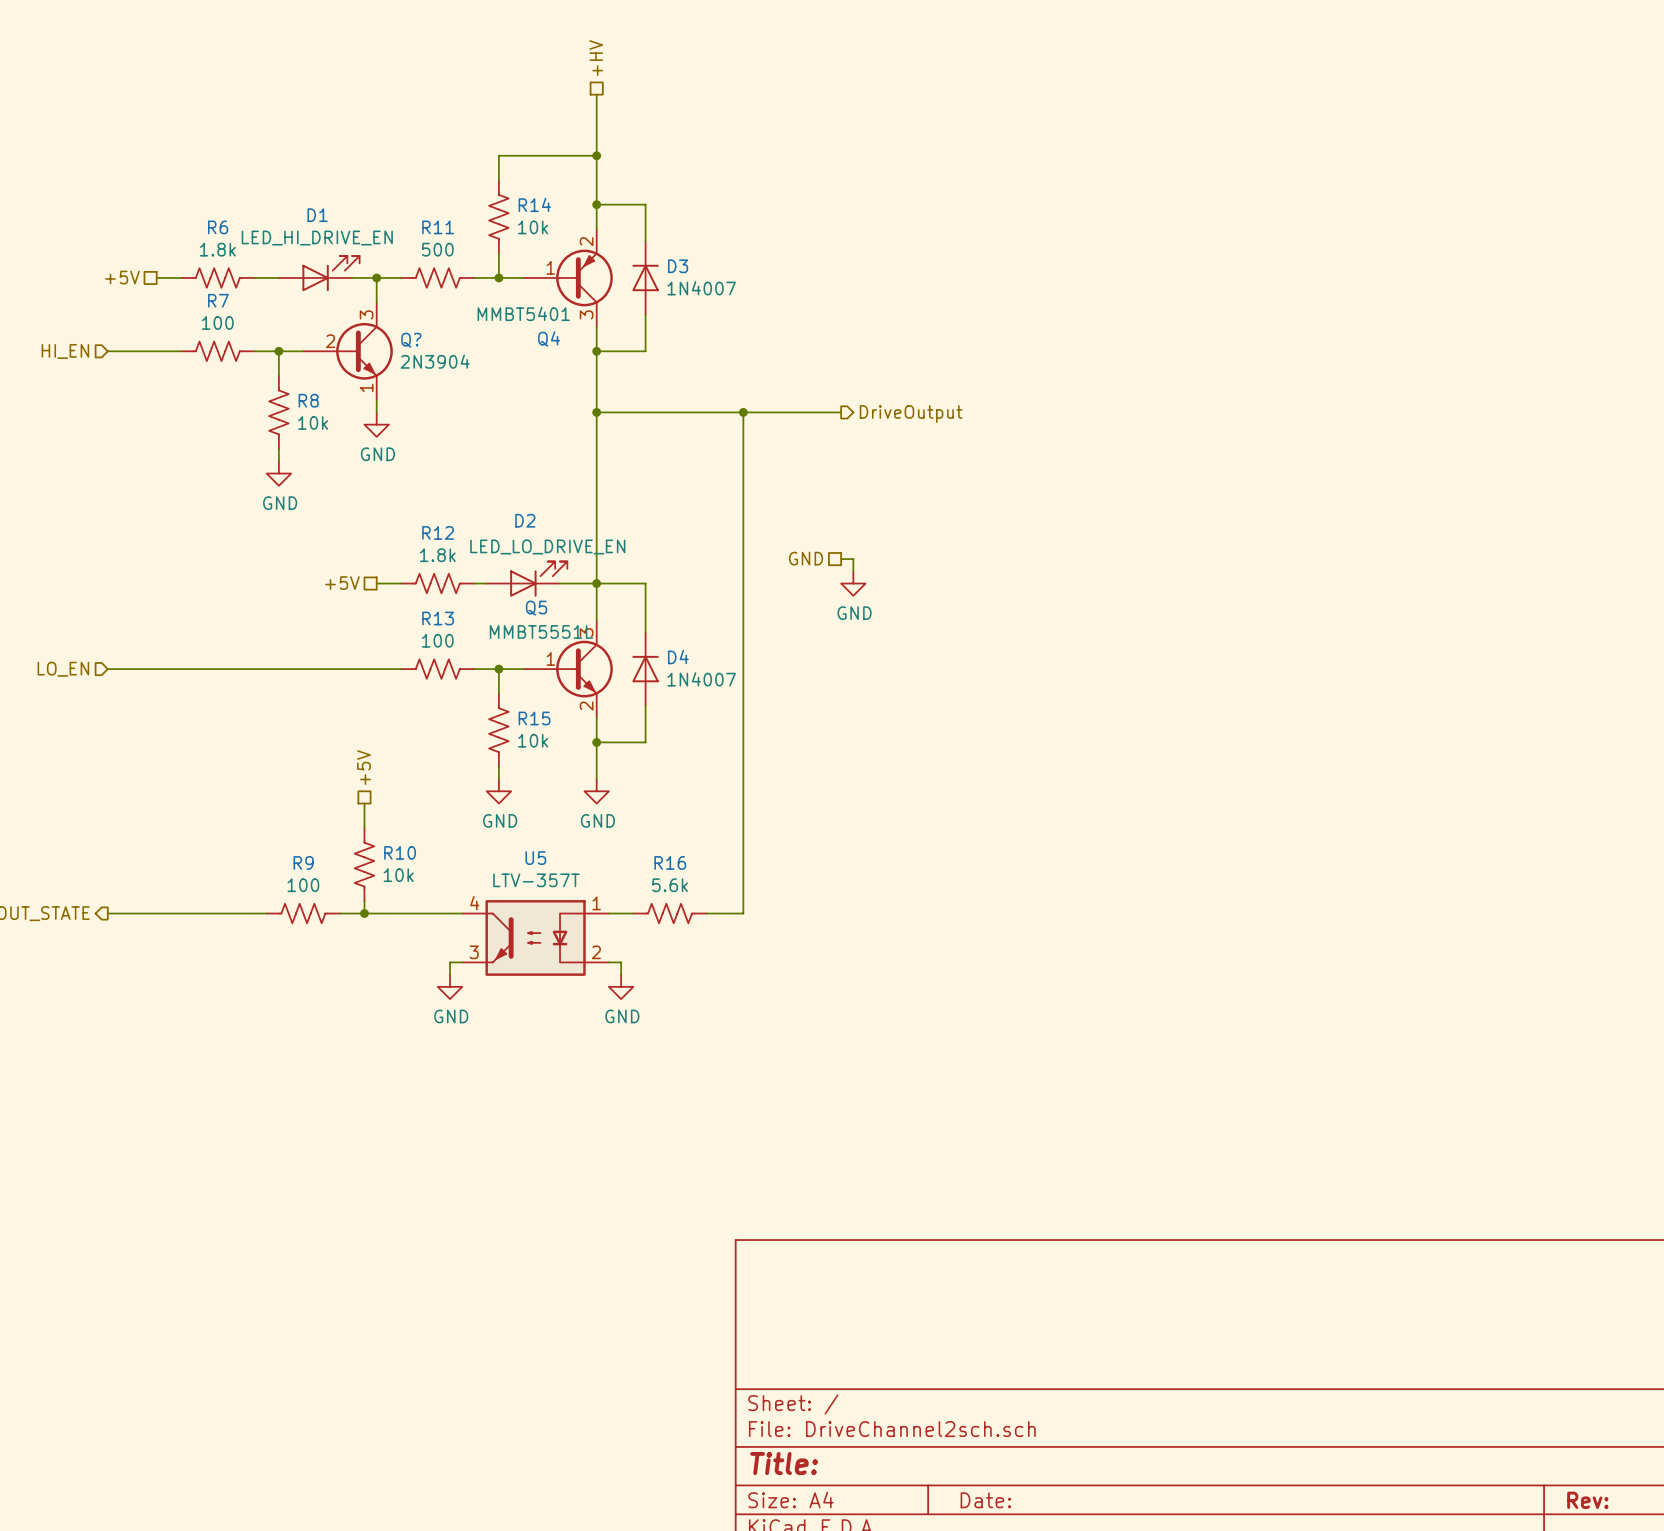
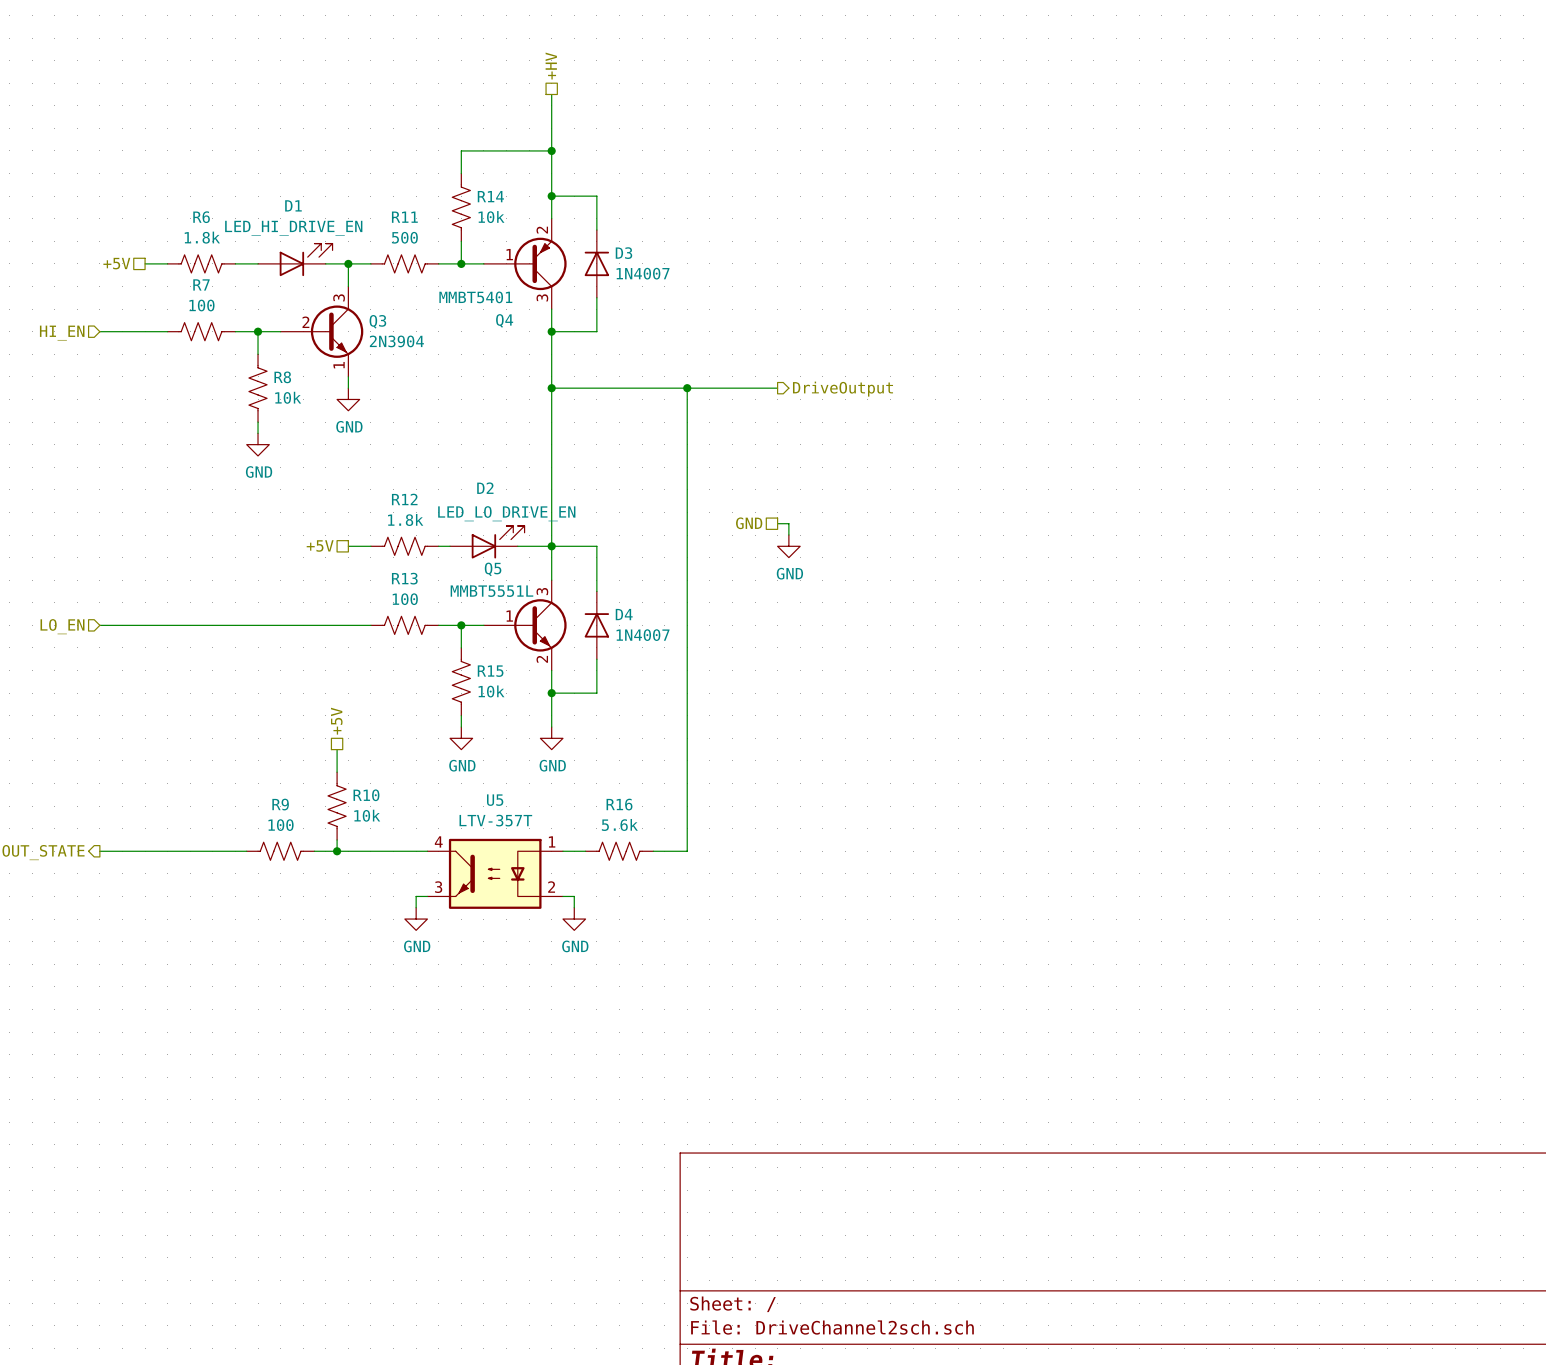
Q? name: Q? (411, 340) -> Q3 (377, 321)

